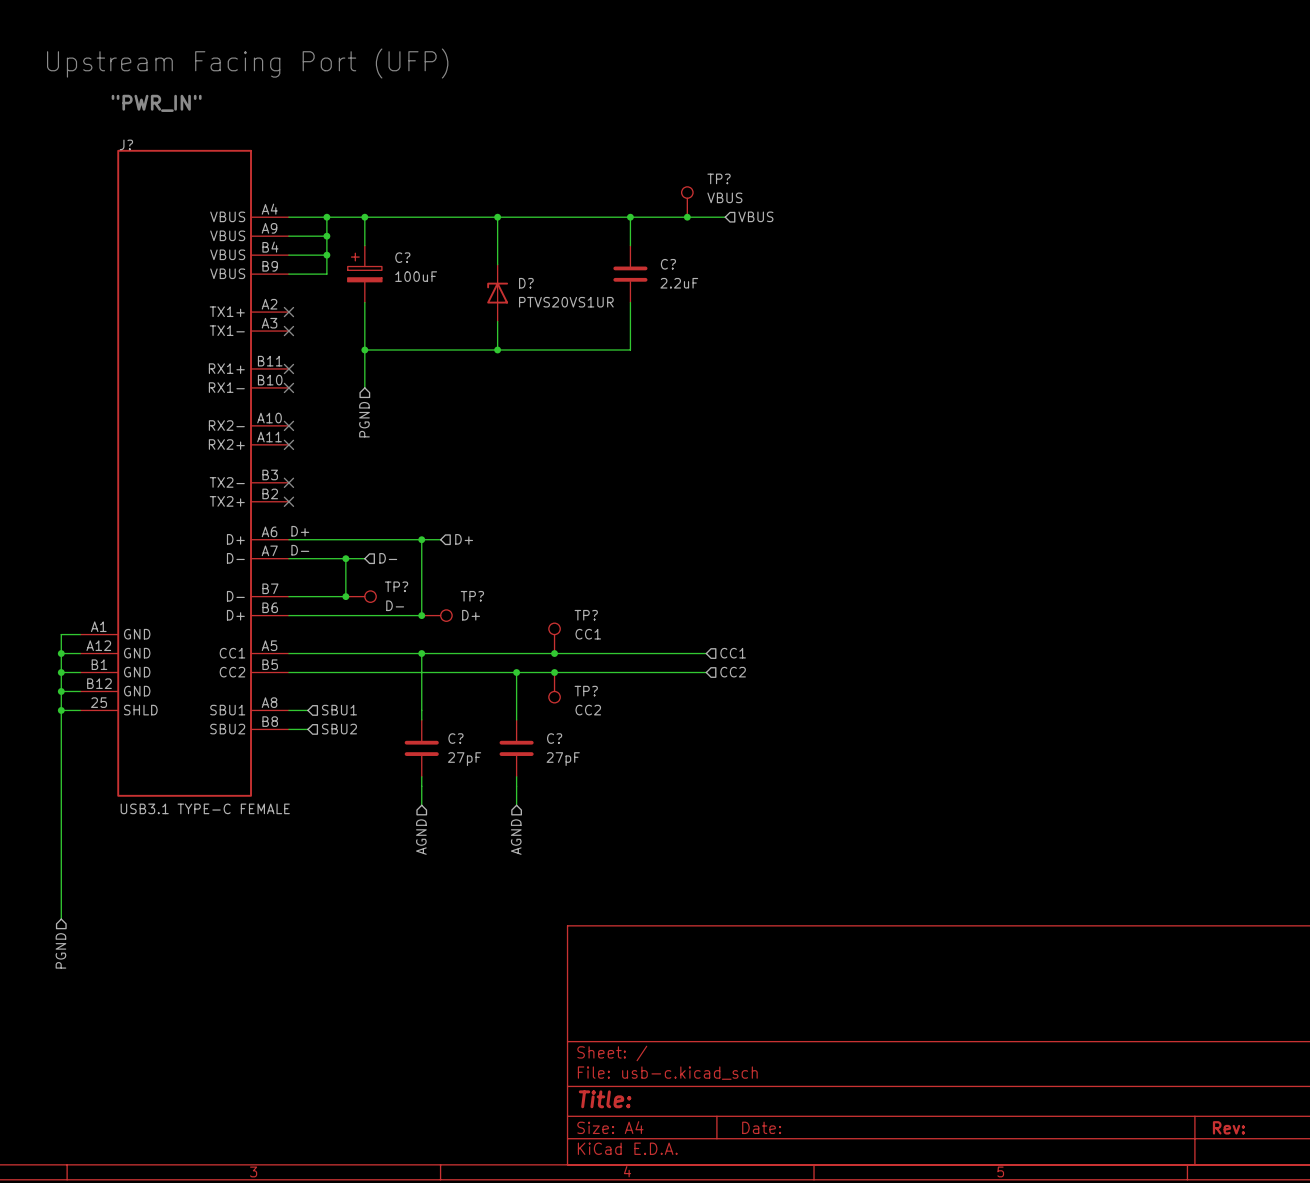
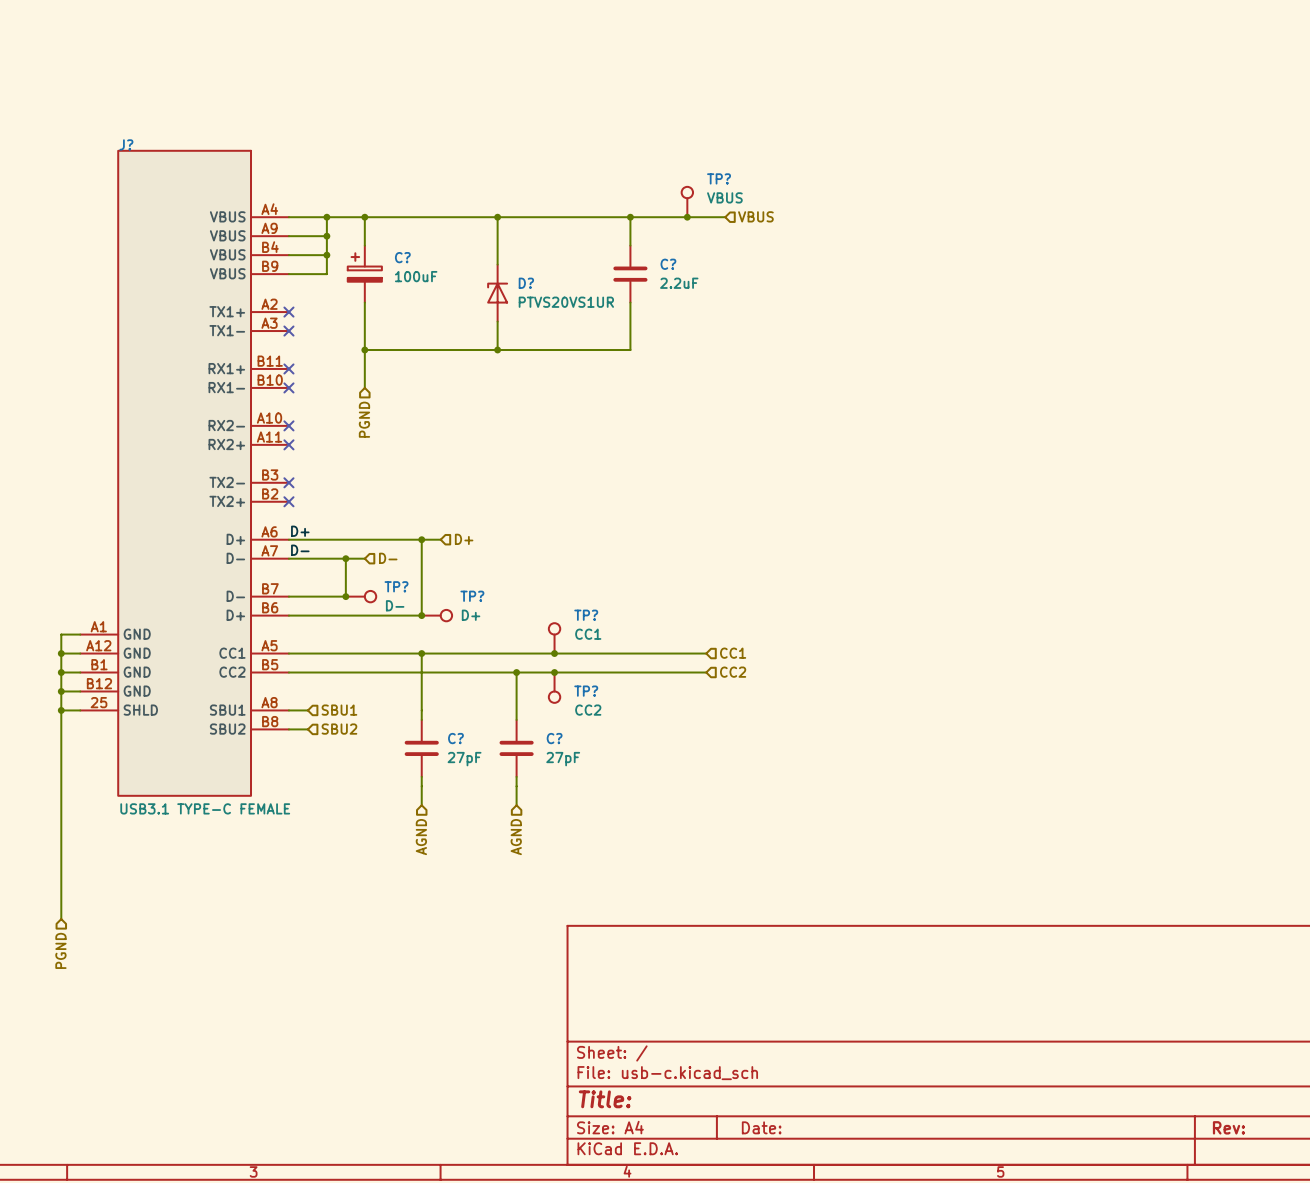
text: Upstream Facing Port (UFP) (247, 63) -> none
text: "PWR_IN" (156, 103) -> none

